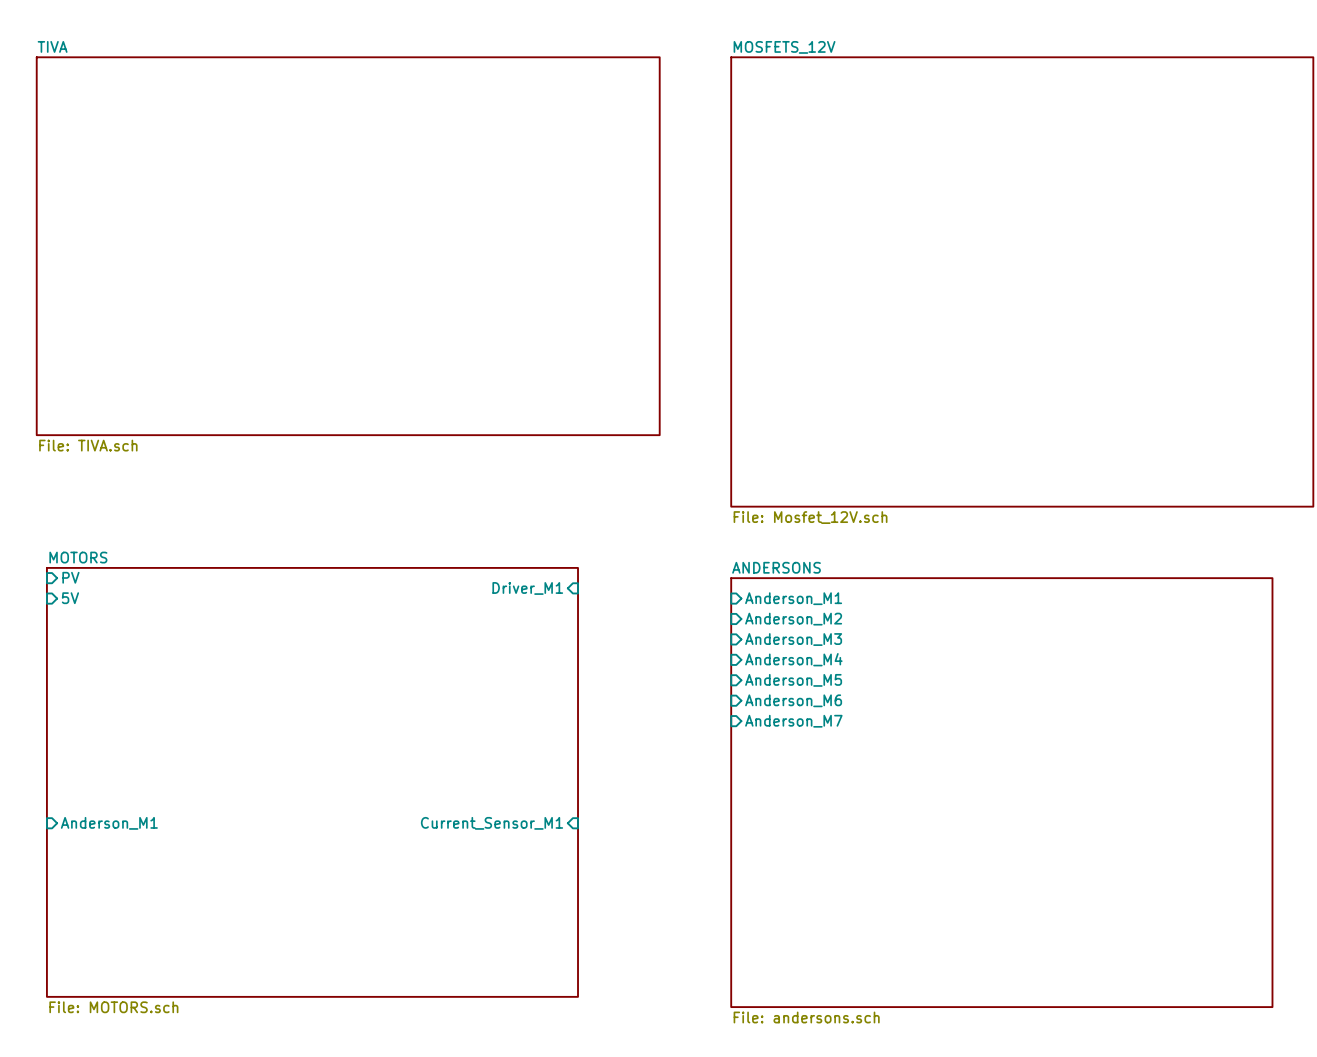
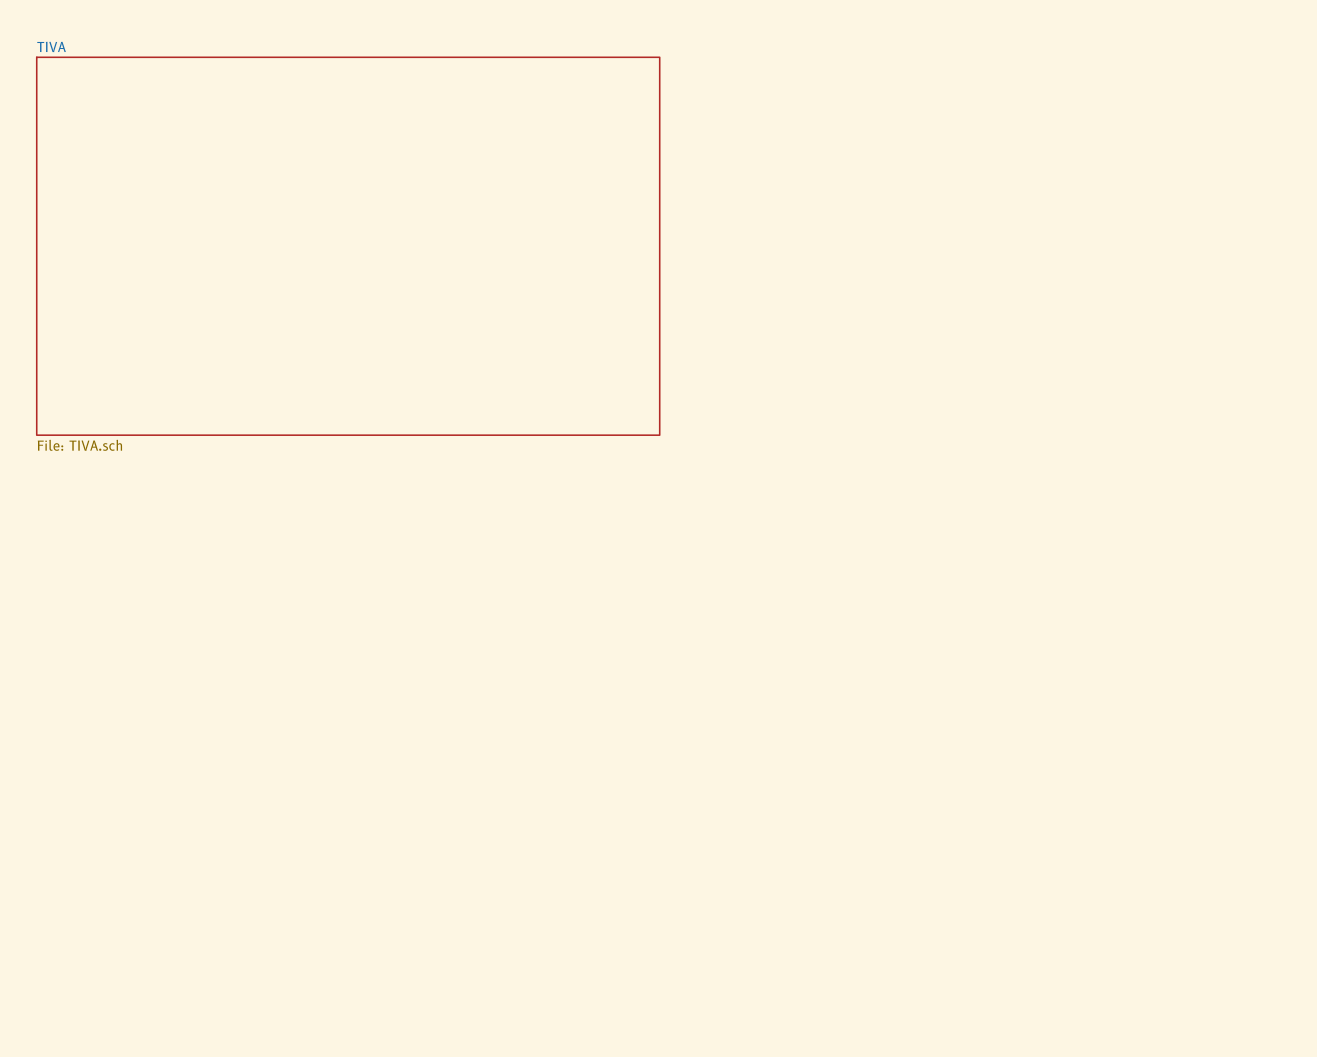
sheet MOSFETS_12V: File: Mosfet_12V.sch (1022, 281) -> none
sheet pin: PV (70, 577) -> none
sheet pin: Driver_M1 (527, 588) -> none
sheet pin: 5V (70, 598) -> none
sheet pin: Anderson_M1 (793, 598) -> none
sheet pin: Anderson_M2 (793, 619) -> none
sheet pin: Anderson_M3 (793, 639) -> none
sheet pin: Anderson_M4 (793, 659) -> none
sheet pin: Anderson_M5 (793, 680) -> none
sheet pin: Anderson_M6 (793, 700) -> none
sheet pin: Anderson_M7 (793, 721) -> none
sheet MOTORS: File: MOTORS.sch (312, 782) -> none
sheet ANDERSONS: File: andersons.sch (1001, 792) -> none
sheet pin: Anderson_M1 (109, 823) -> none
sheet pin: Current_Sensor_M1 (492, 823) -> none

